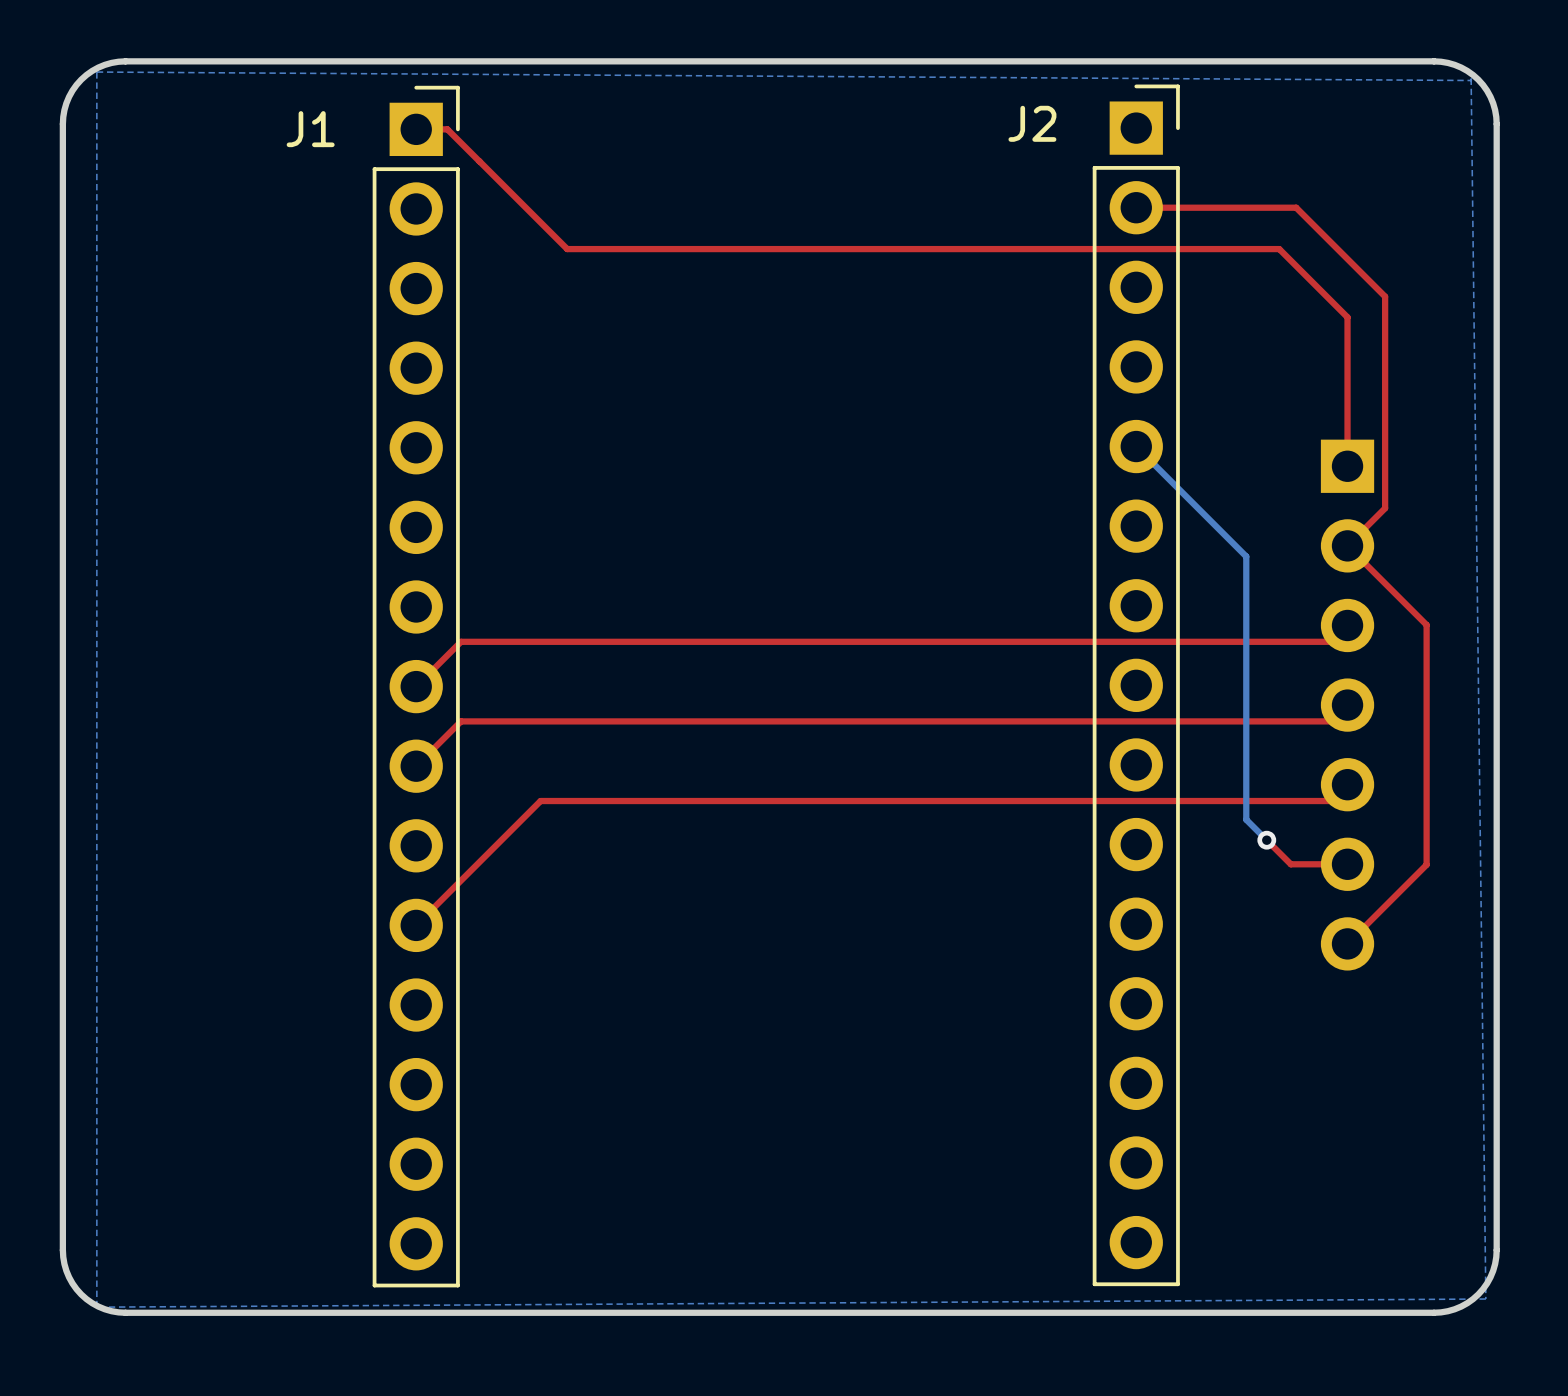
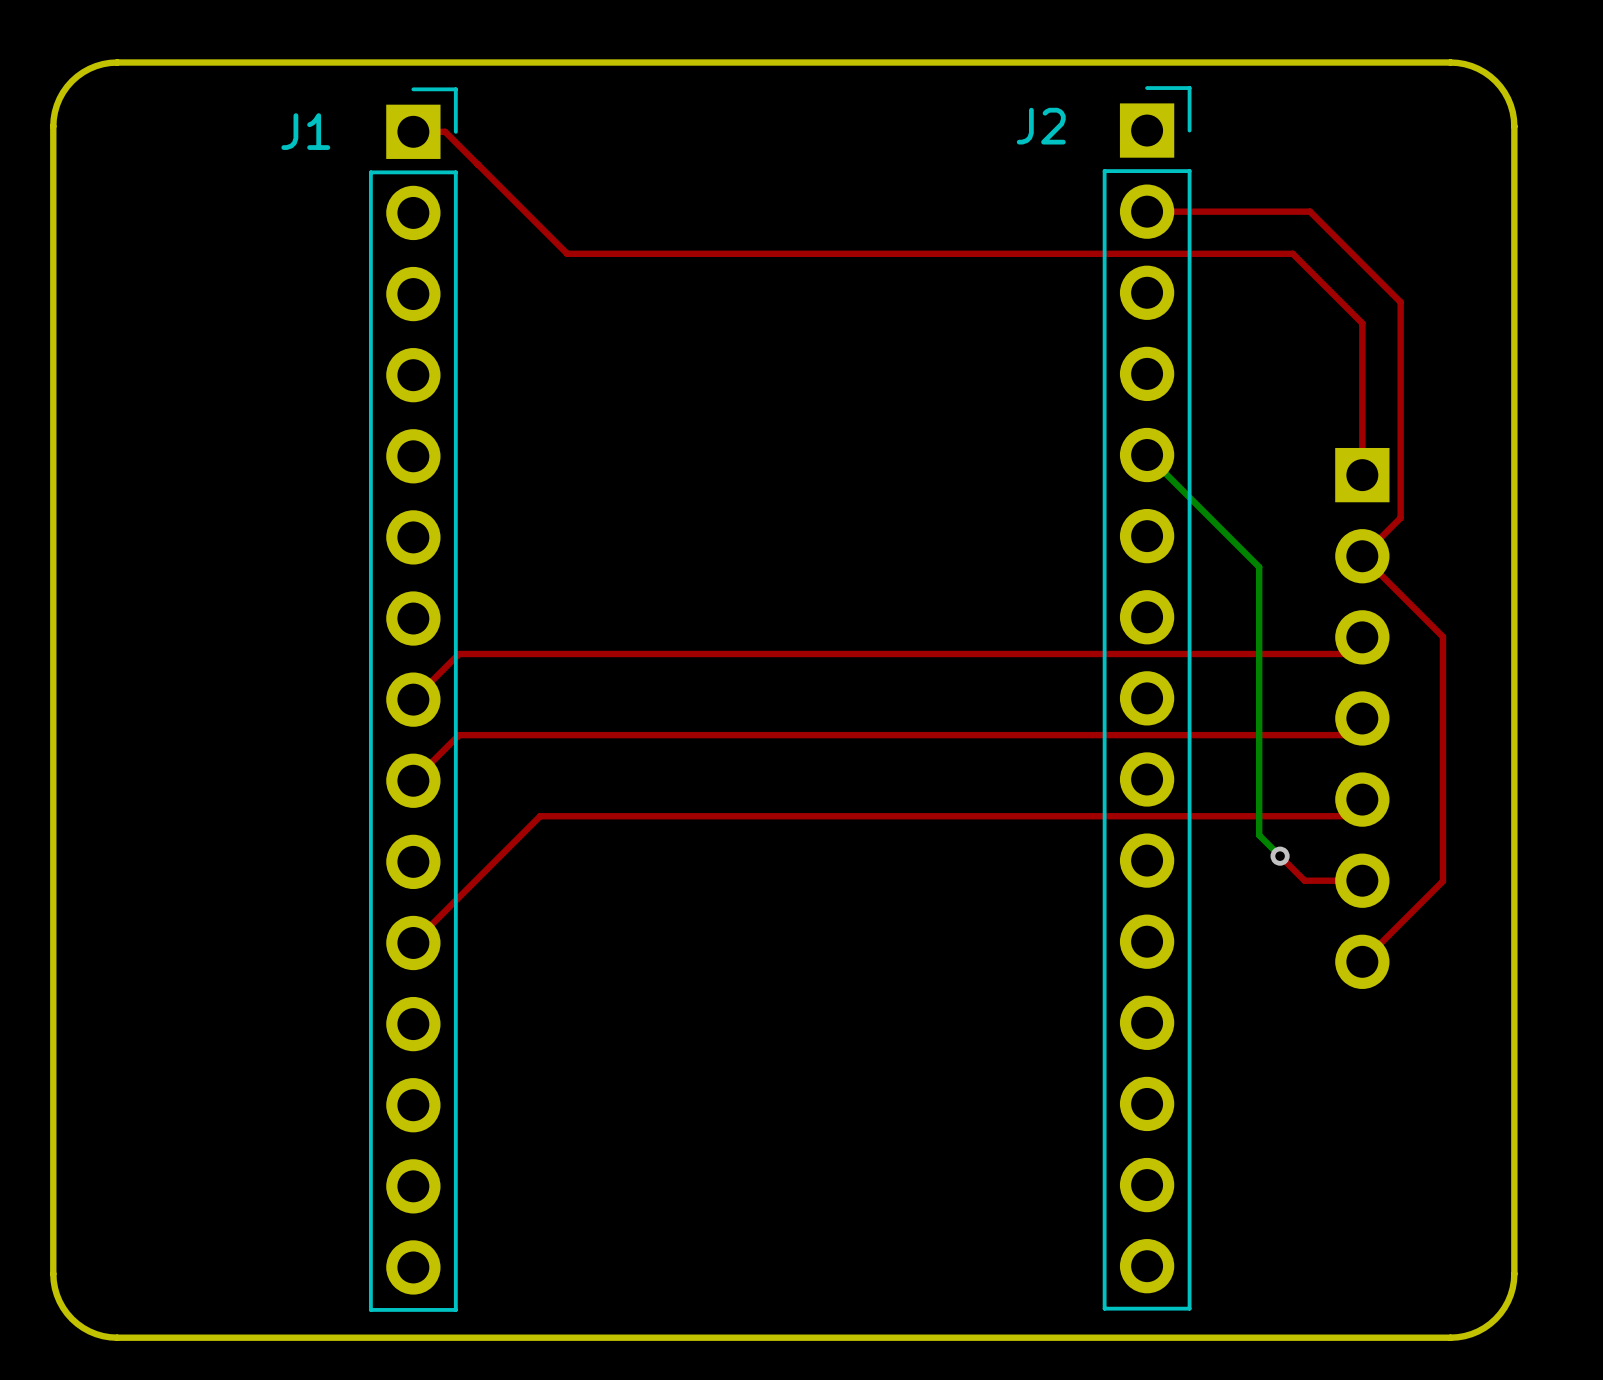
bottom zone outline: (96, 72) (96, 1307) (1485, 1299) (1471, 78) (1471, 80) (96, 72) -> none

